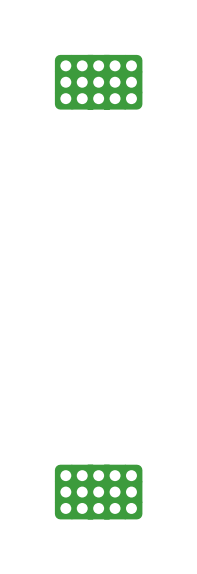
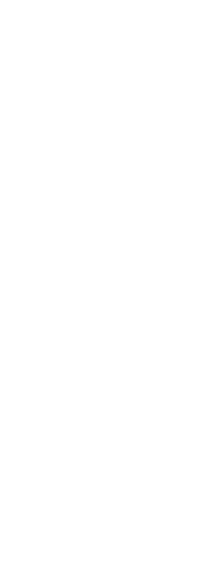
part: (98, 82) -> none
part: (98, 492) -> none

